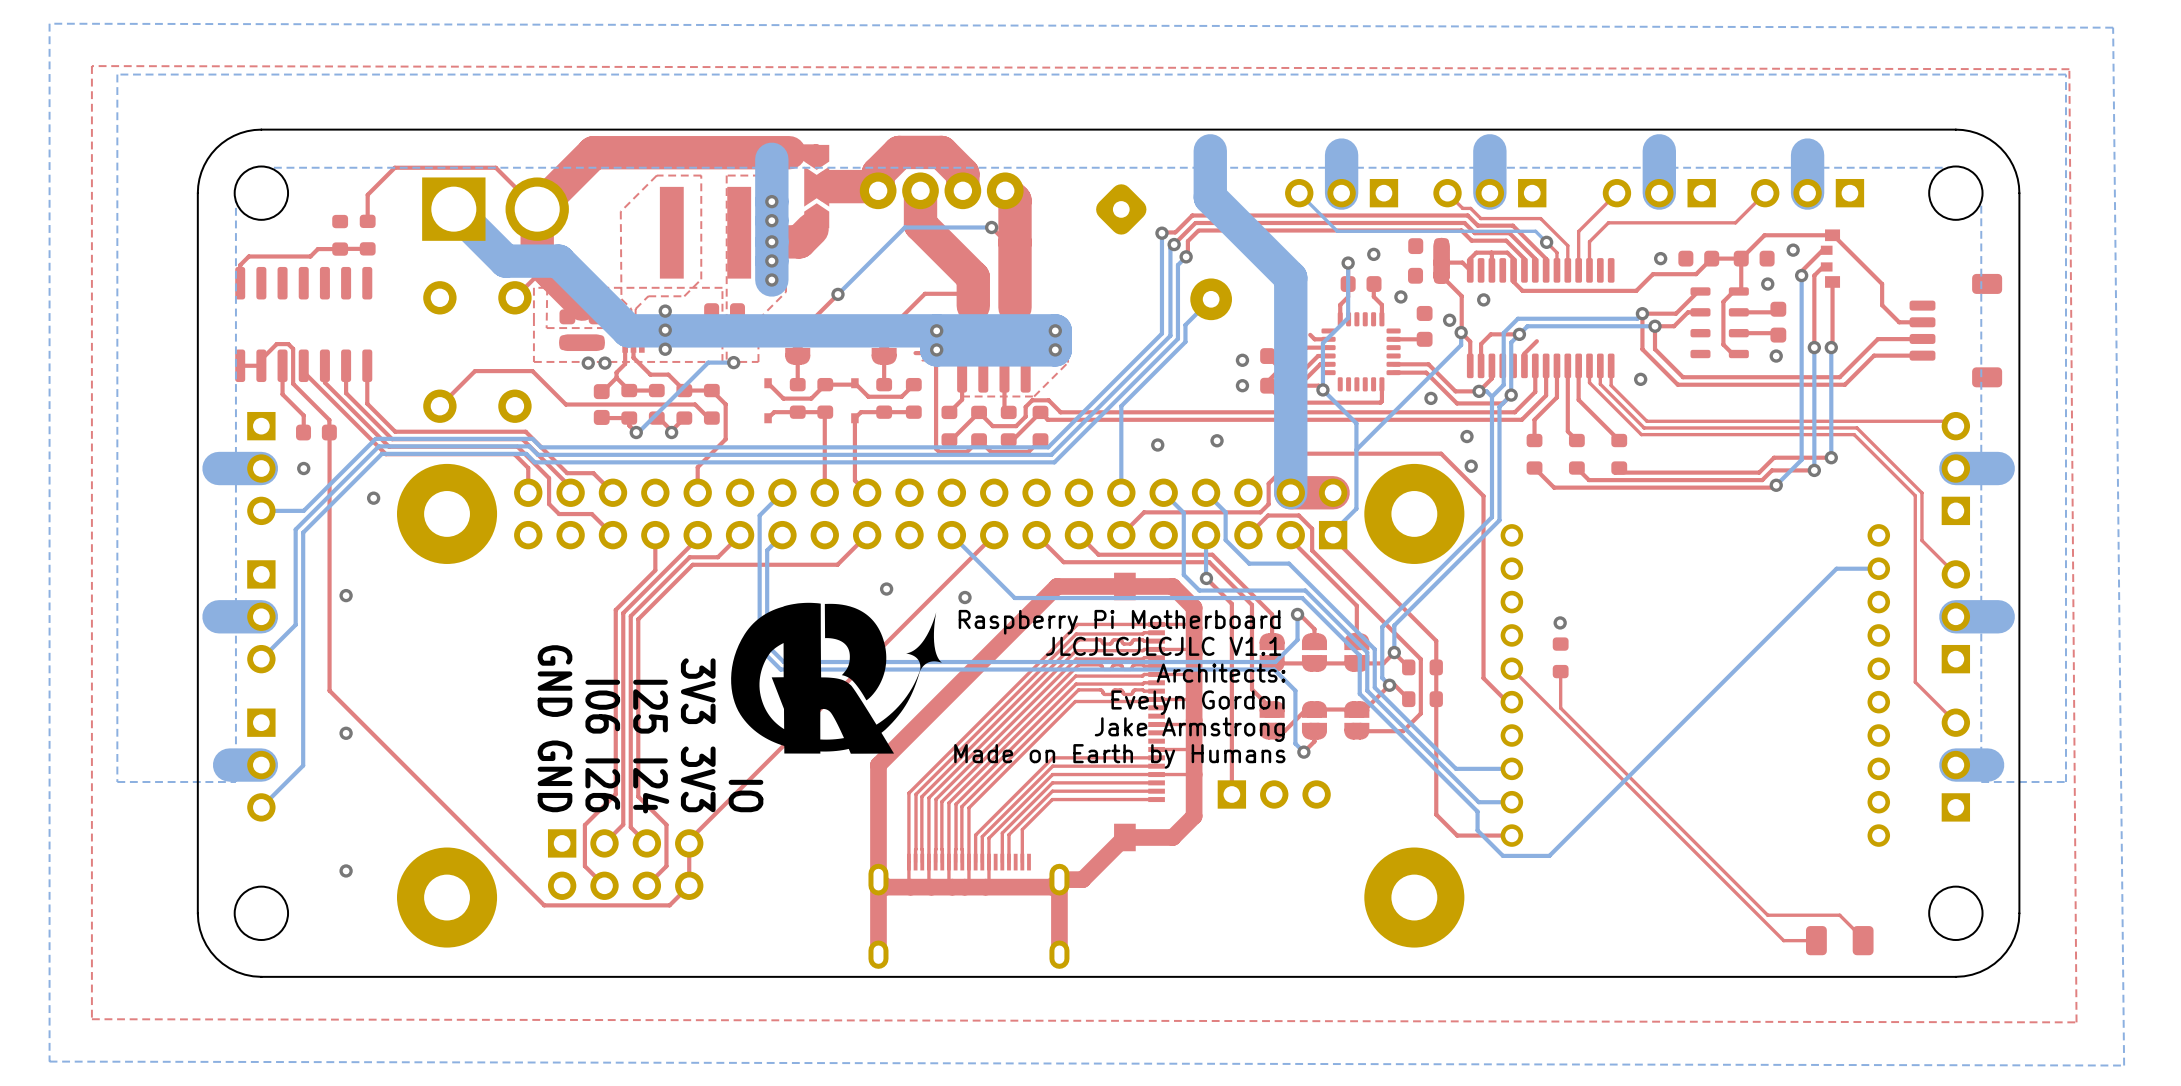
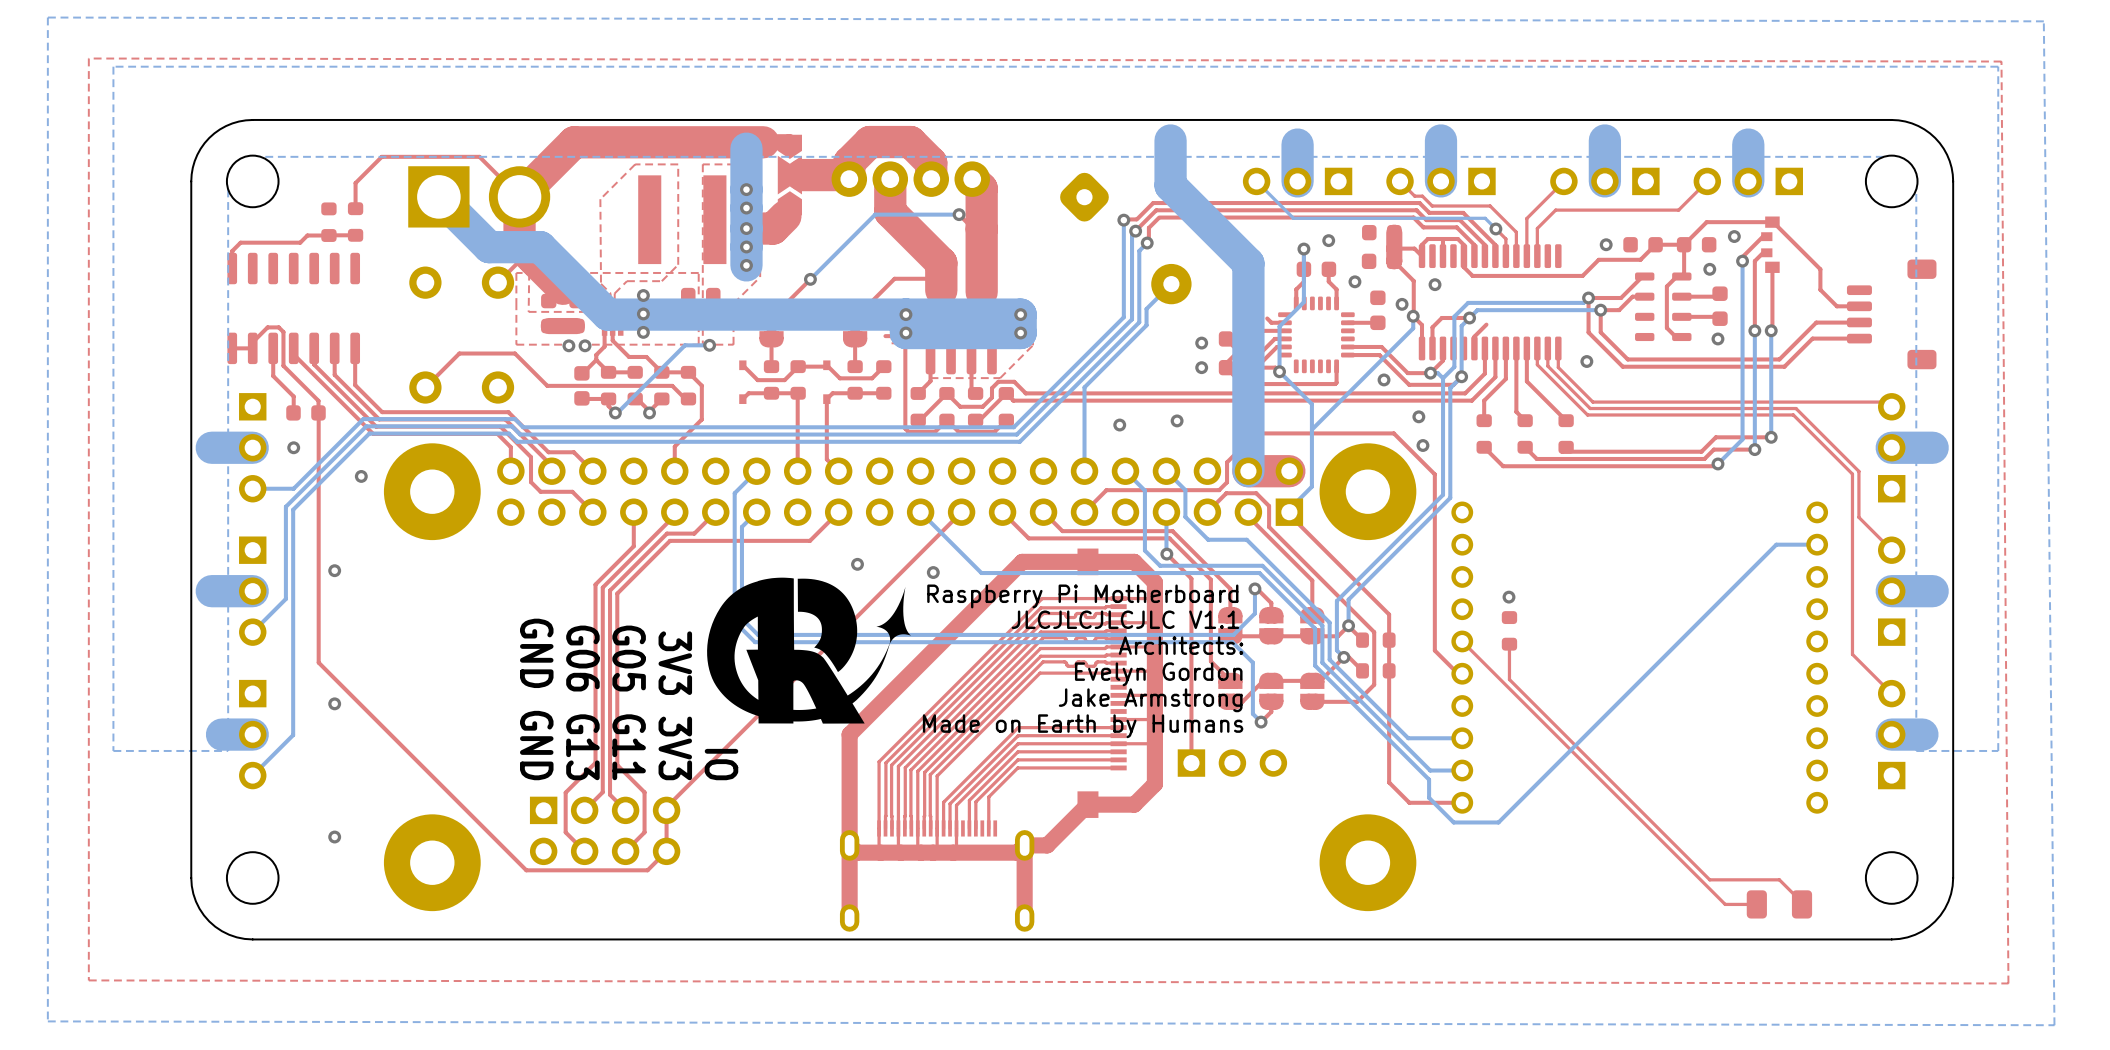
text: I06 I26 (602, 746) -> G06 G13 (582, 702)
text: I25 I24 (651, 746) -> G05 G11 (629, 702)

